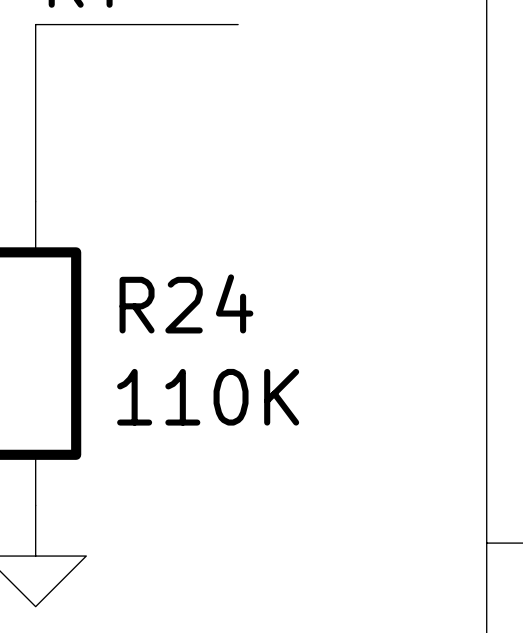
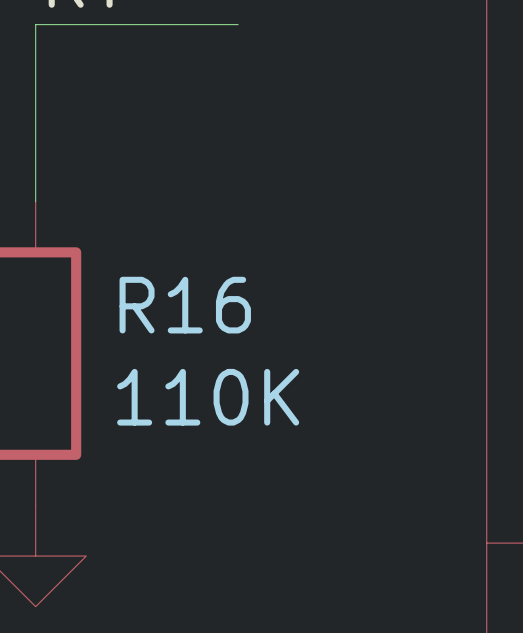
R24 name: R24 (186, 303) -> R16 (185, 305)

